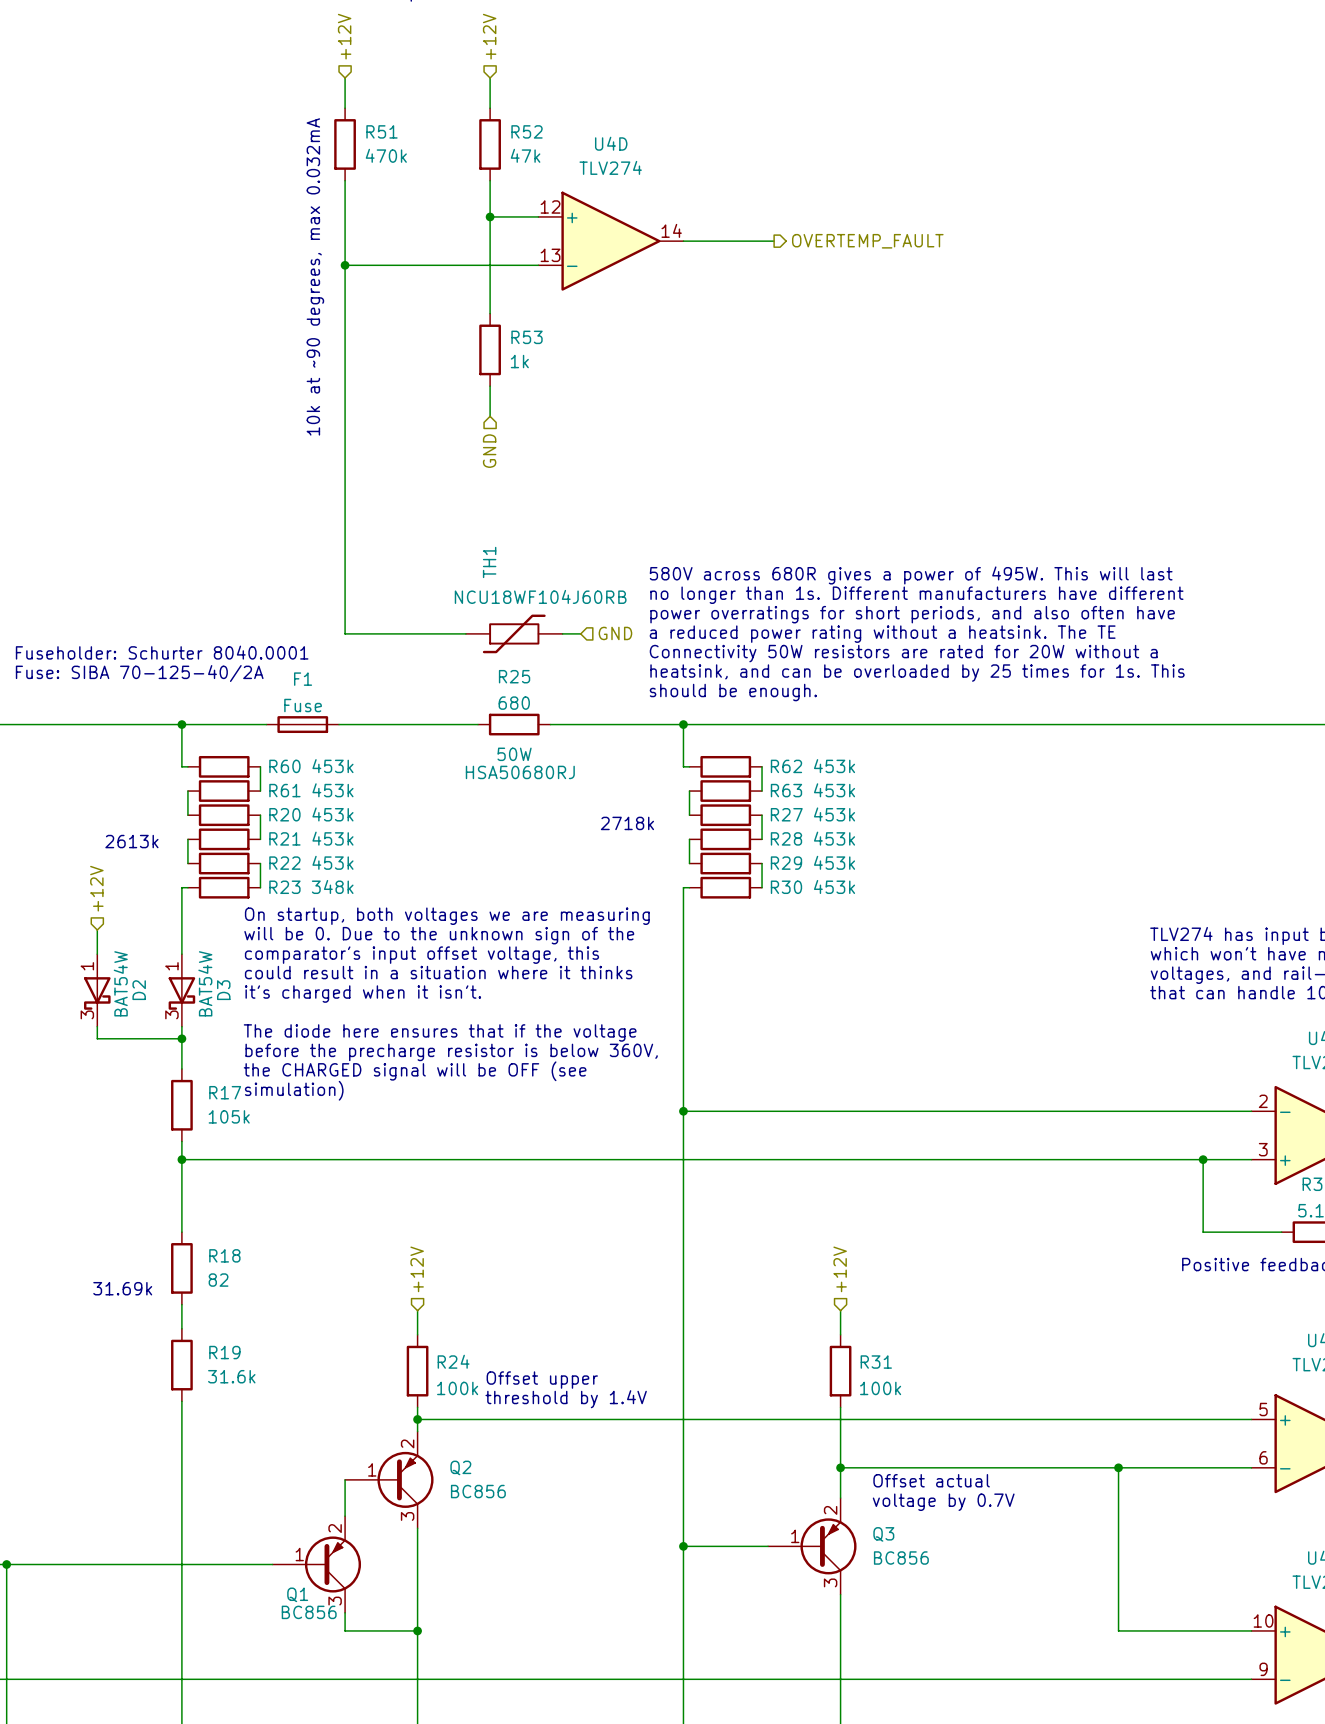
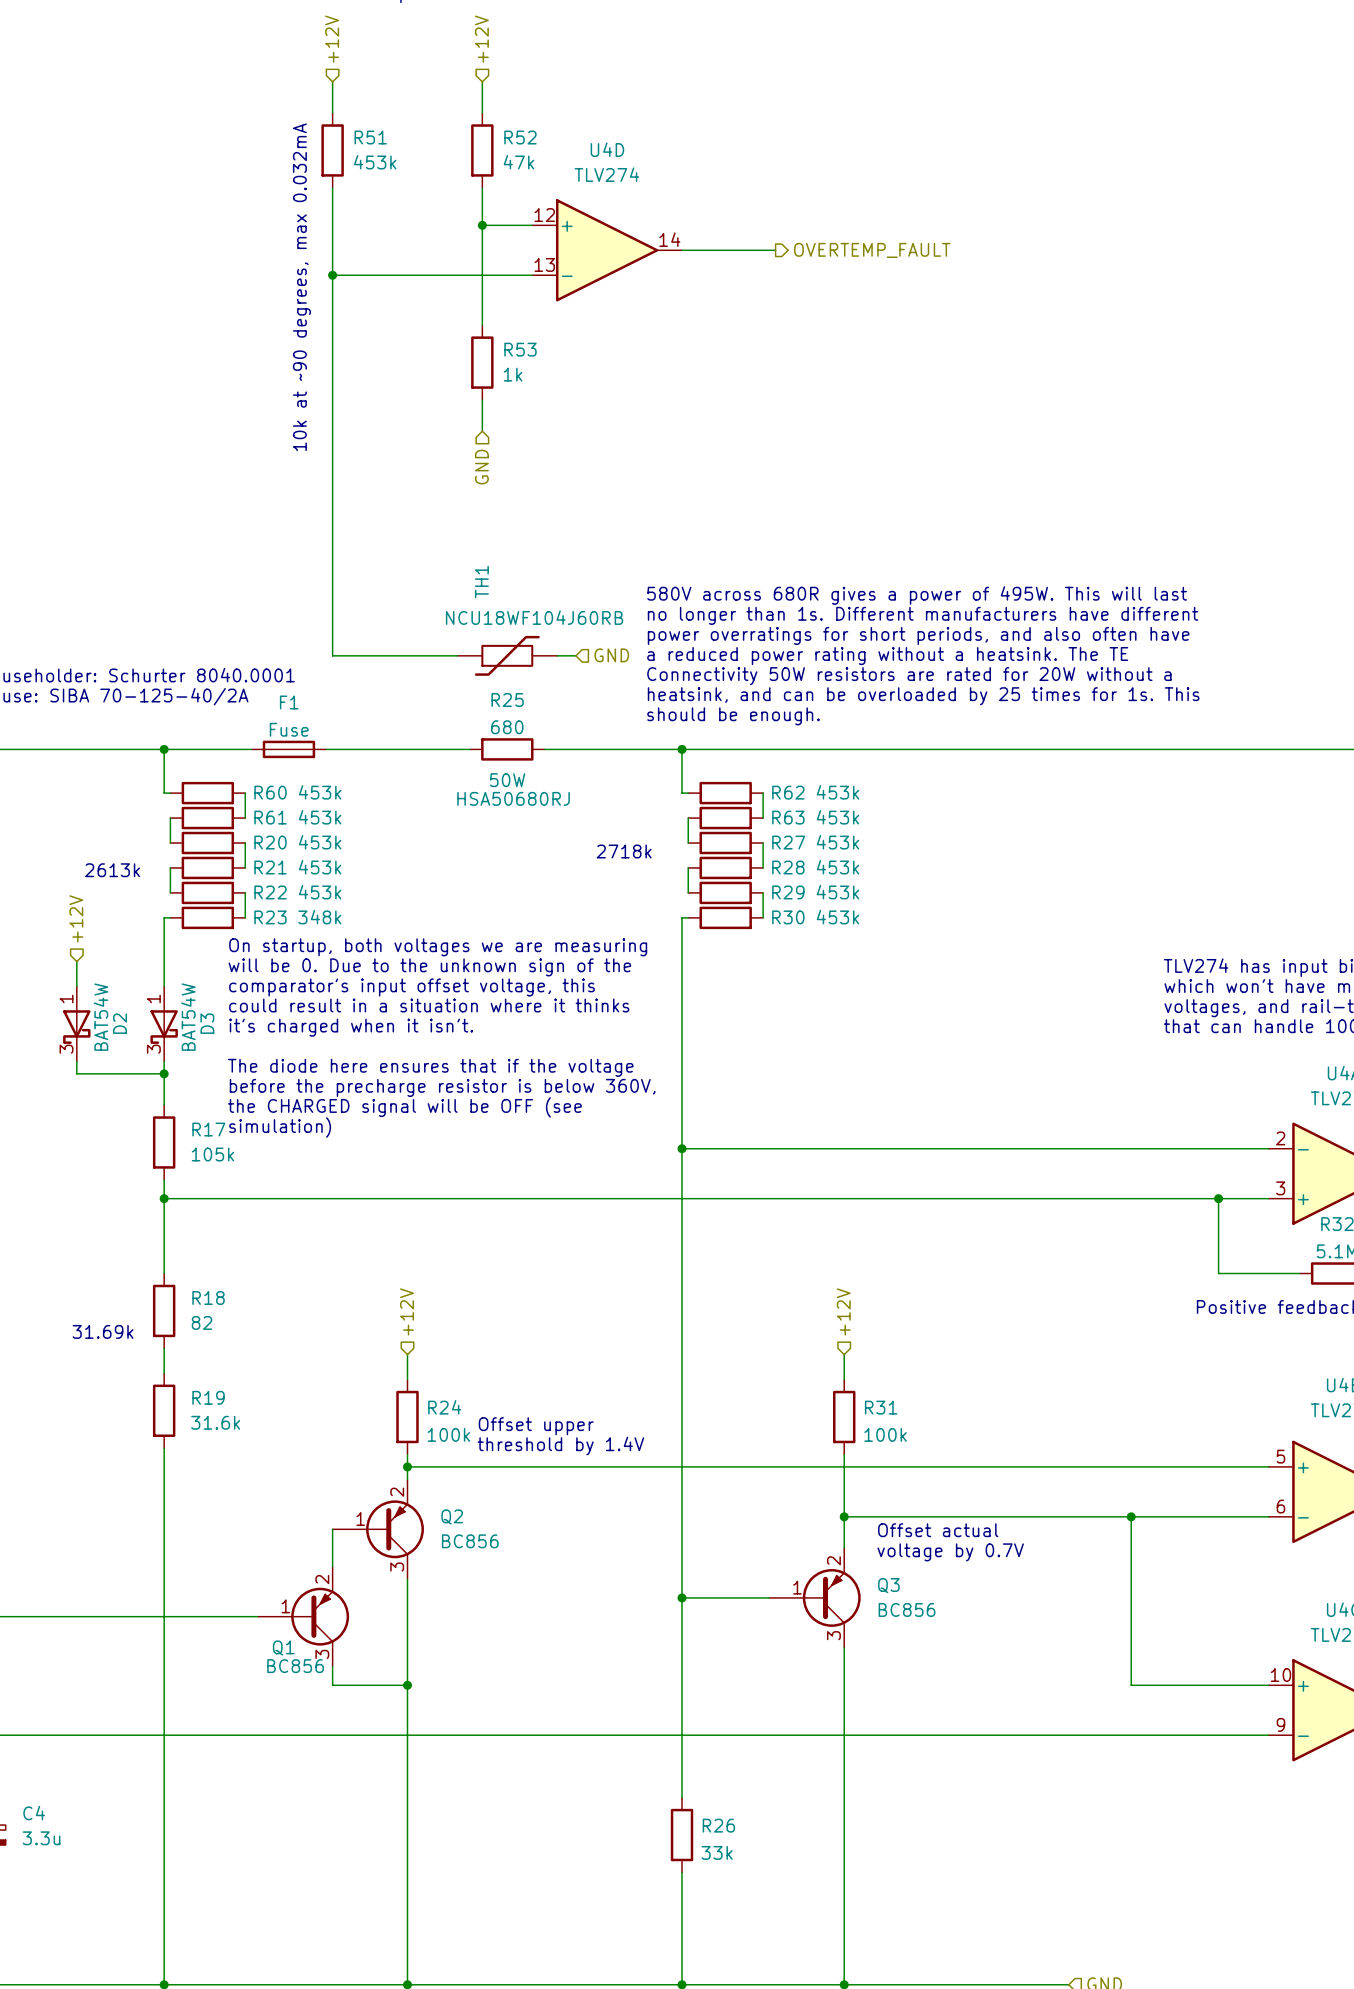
R51 value: 470k (386, 155) -> 453k (375, 162)

